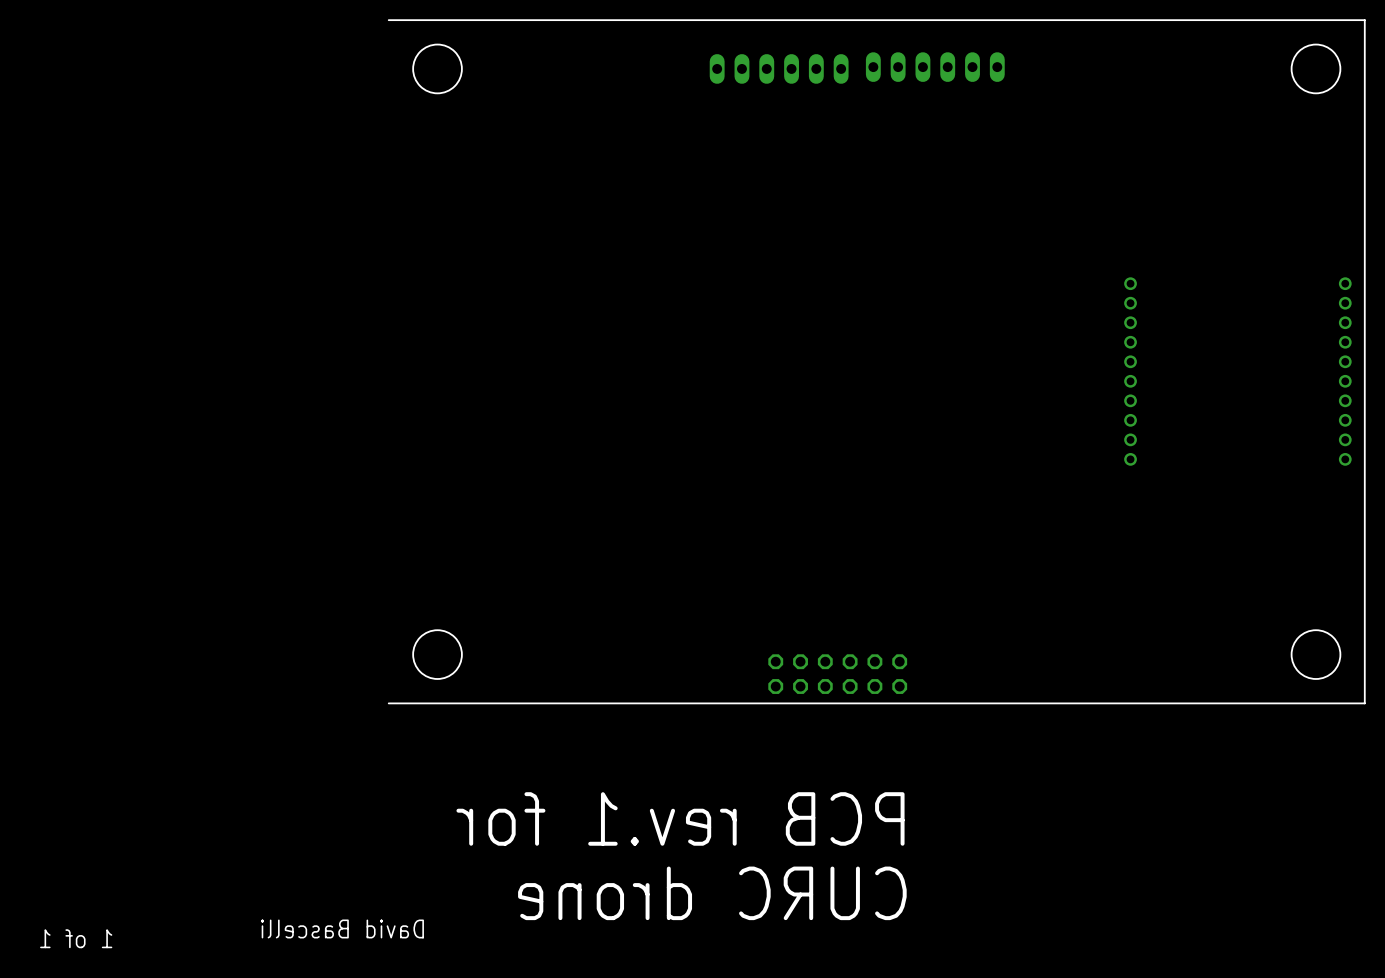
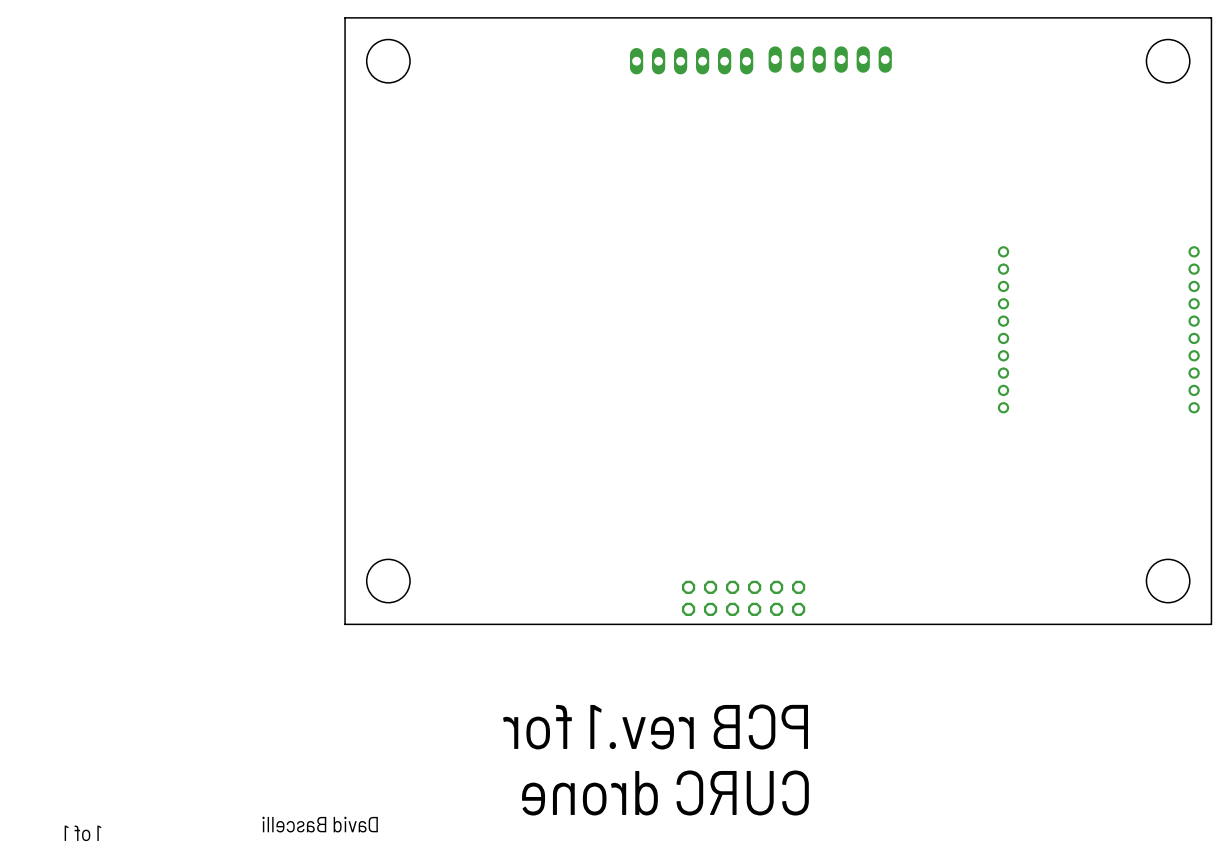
board edge: none -> (345, 17) (345, 624)

